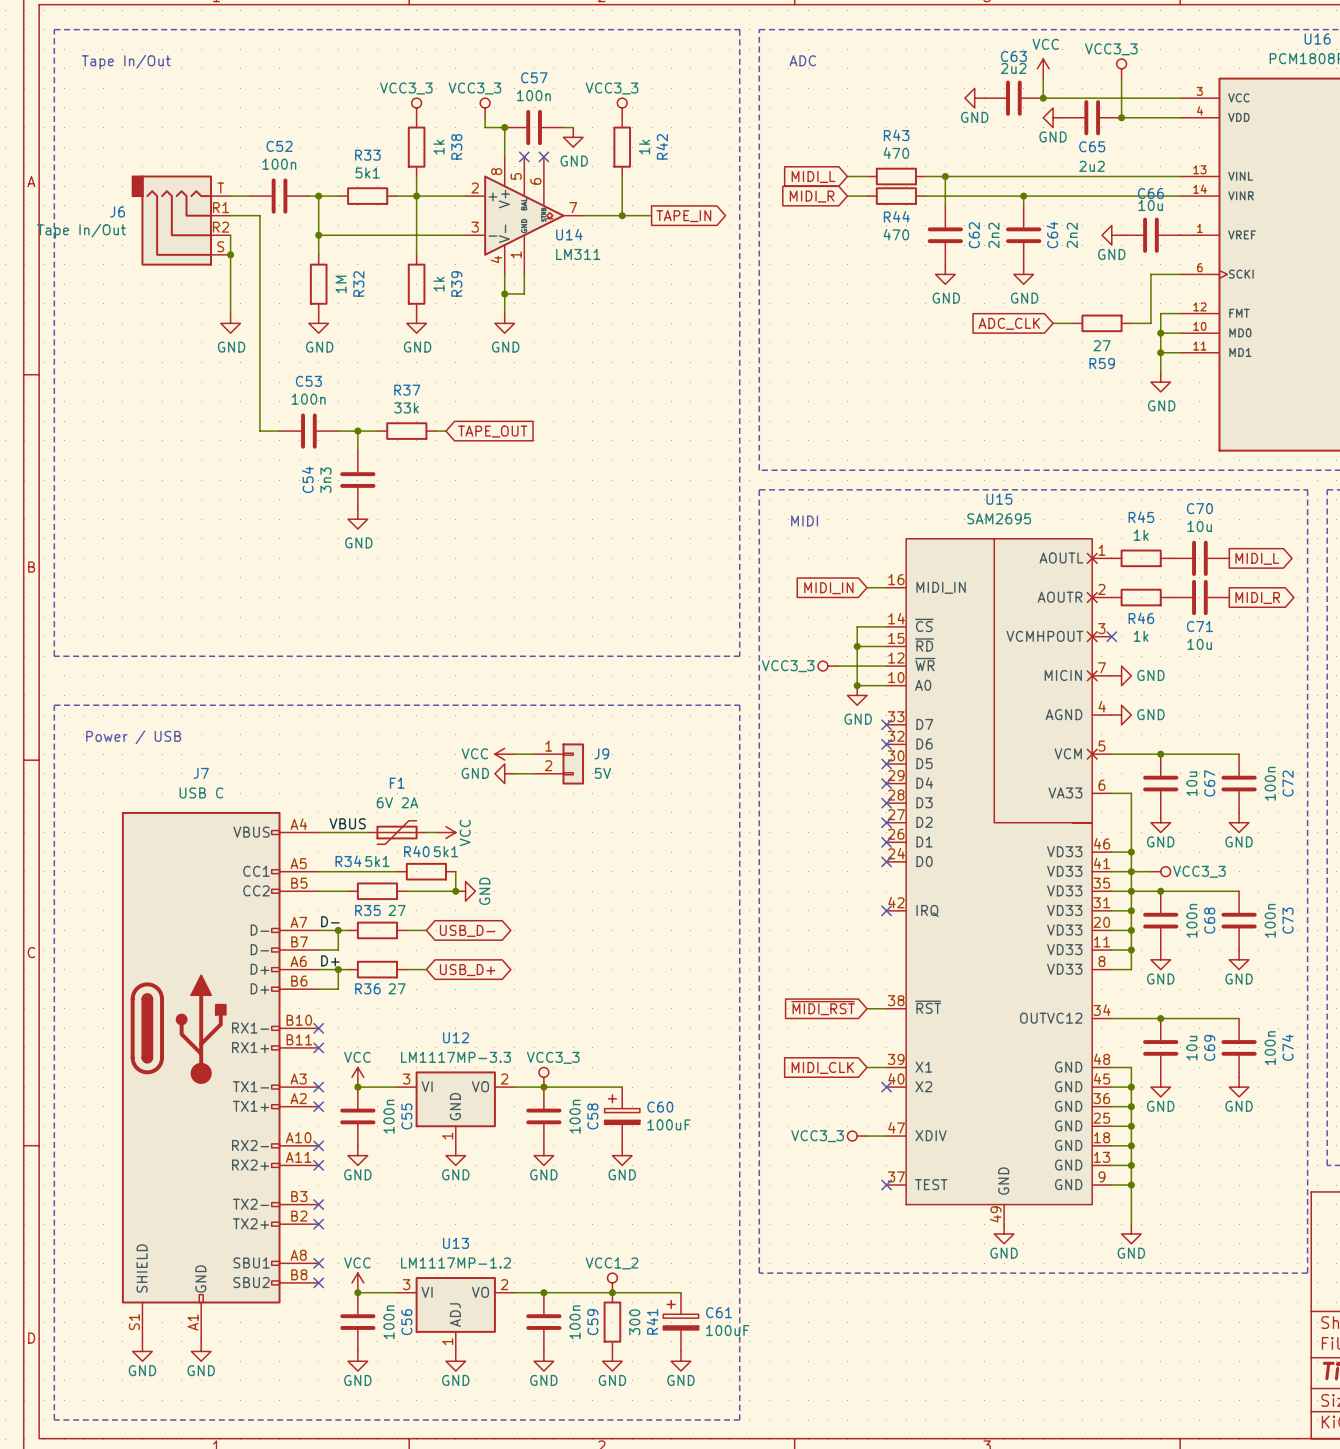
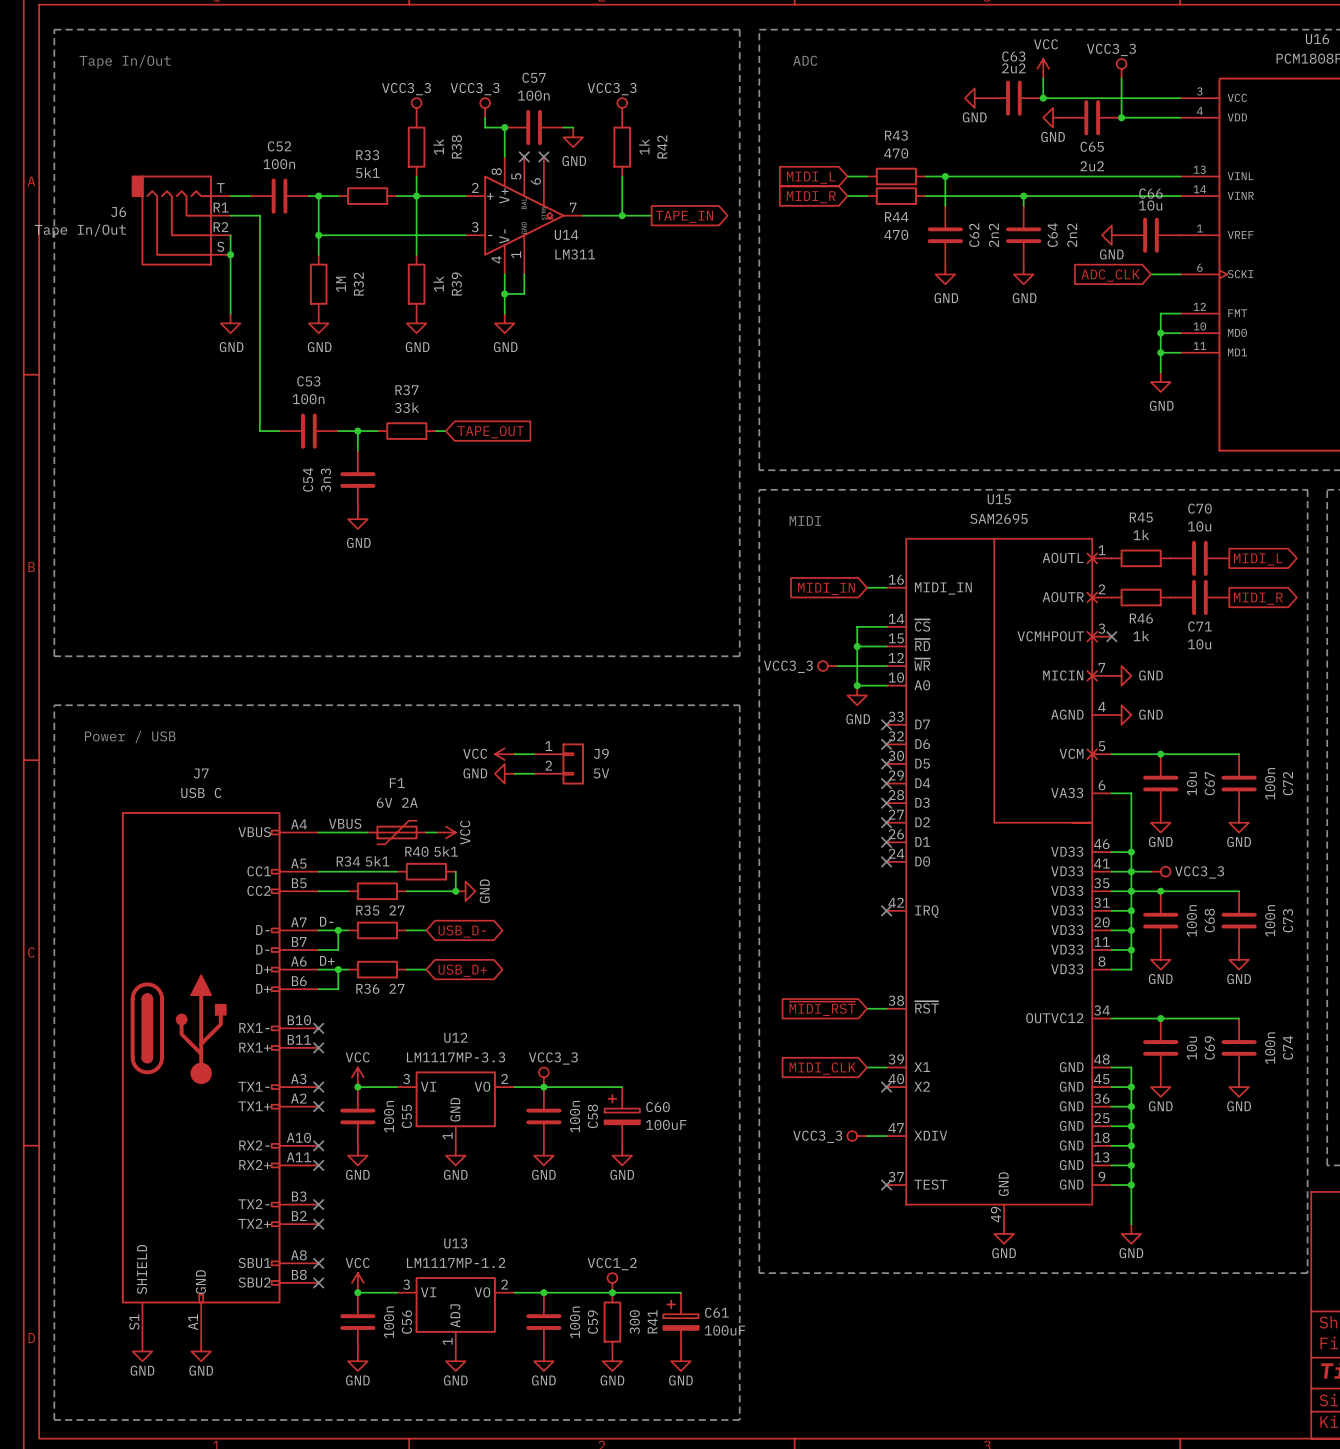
wire: (1150, 274) (1150, 323) (1131, 323) -> none
global label position: ADC_CLK (1009, 323) -> ADC_CLK (1110, 275)
wire: (1053, 323) (1072, 323) -> none
R59: 27 (1101, 323) -> none

